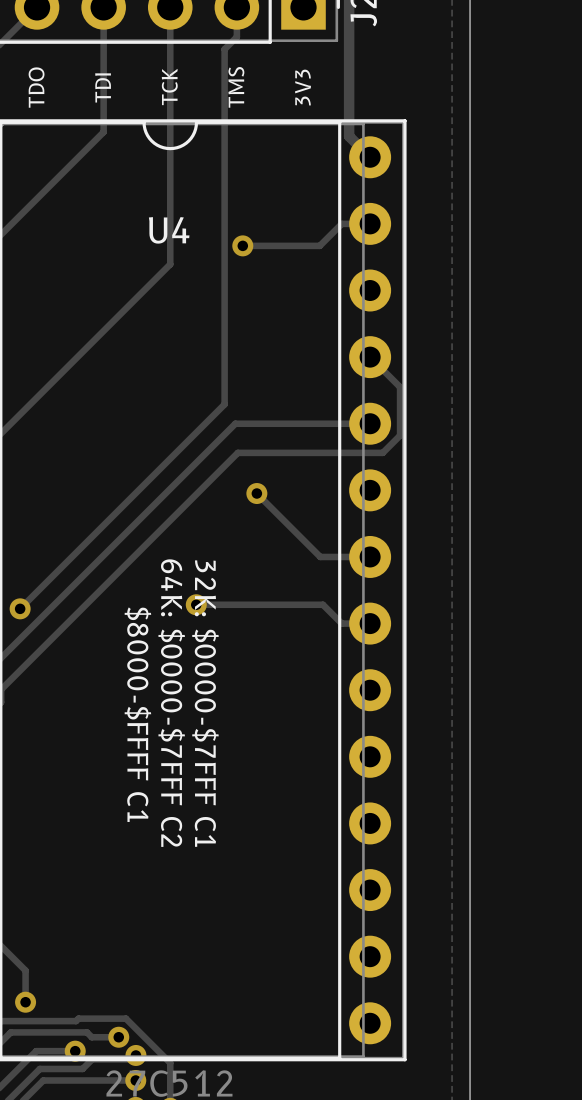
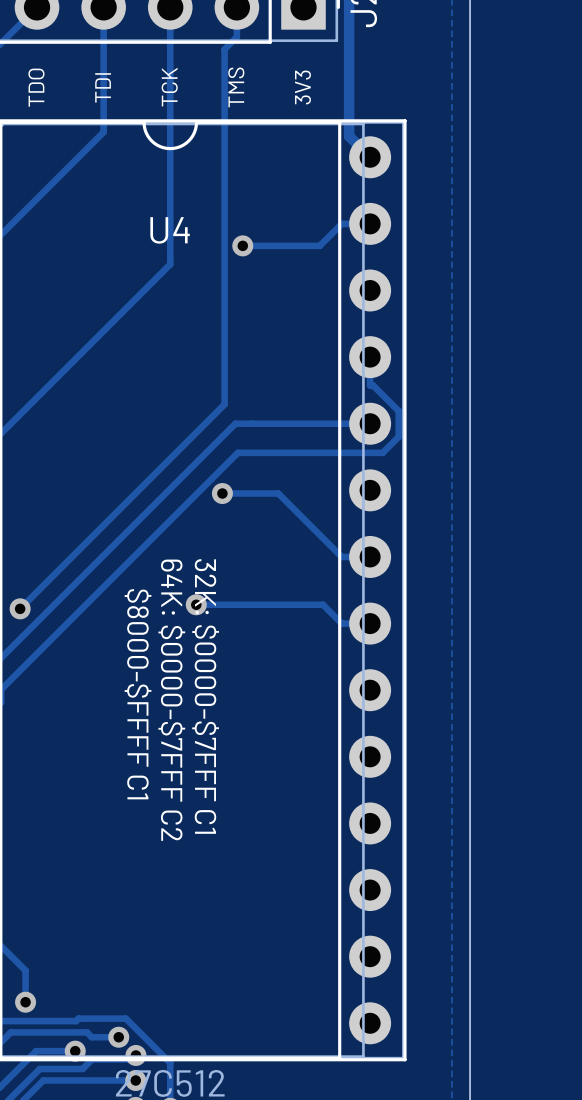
track: (370, 357) (400, 387) (398, 436) -> (370, 357) (370, 385) (373, 385) (398, 411) (398, 436)
track: (256, 493) (320, 556) (341, 556) -> (222, 493) (278, 493) (341, 556)
via position: (256, 493) -> (222, 493)

